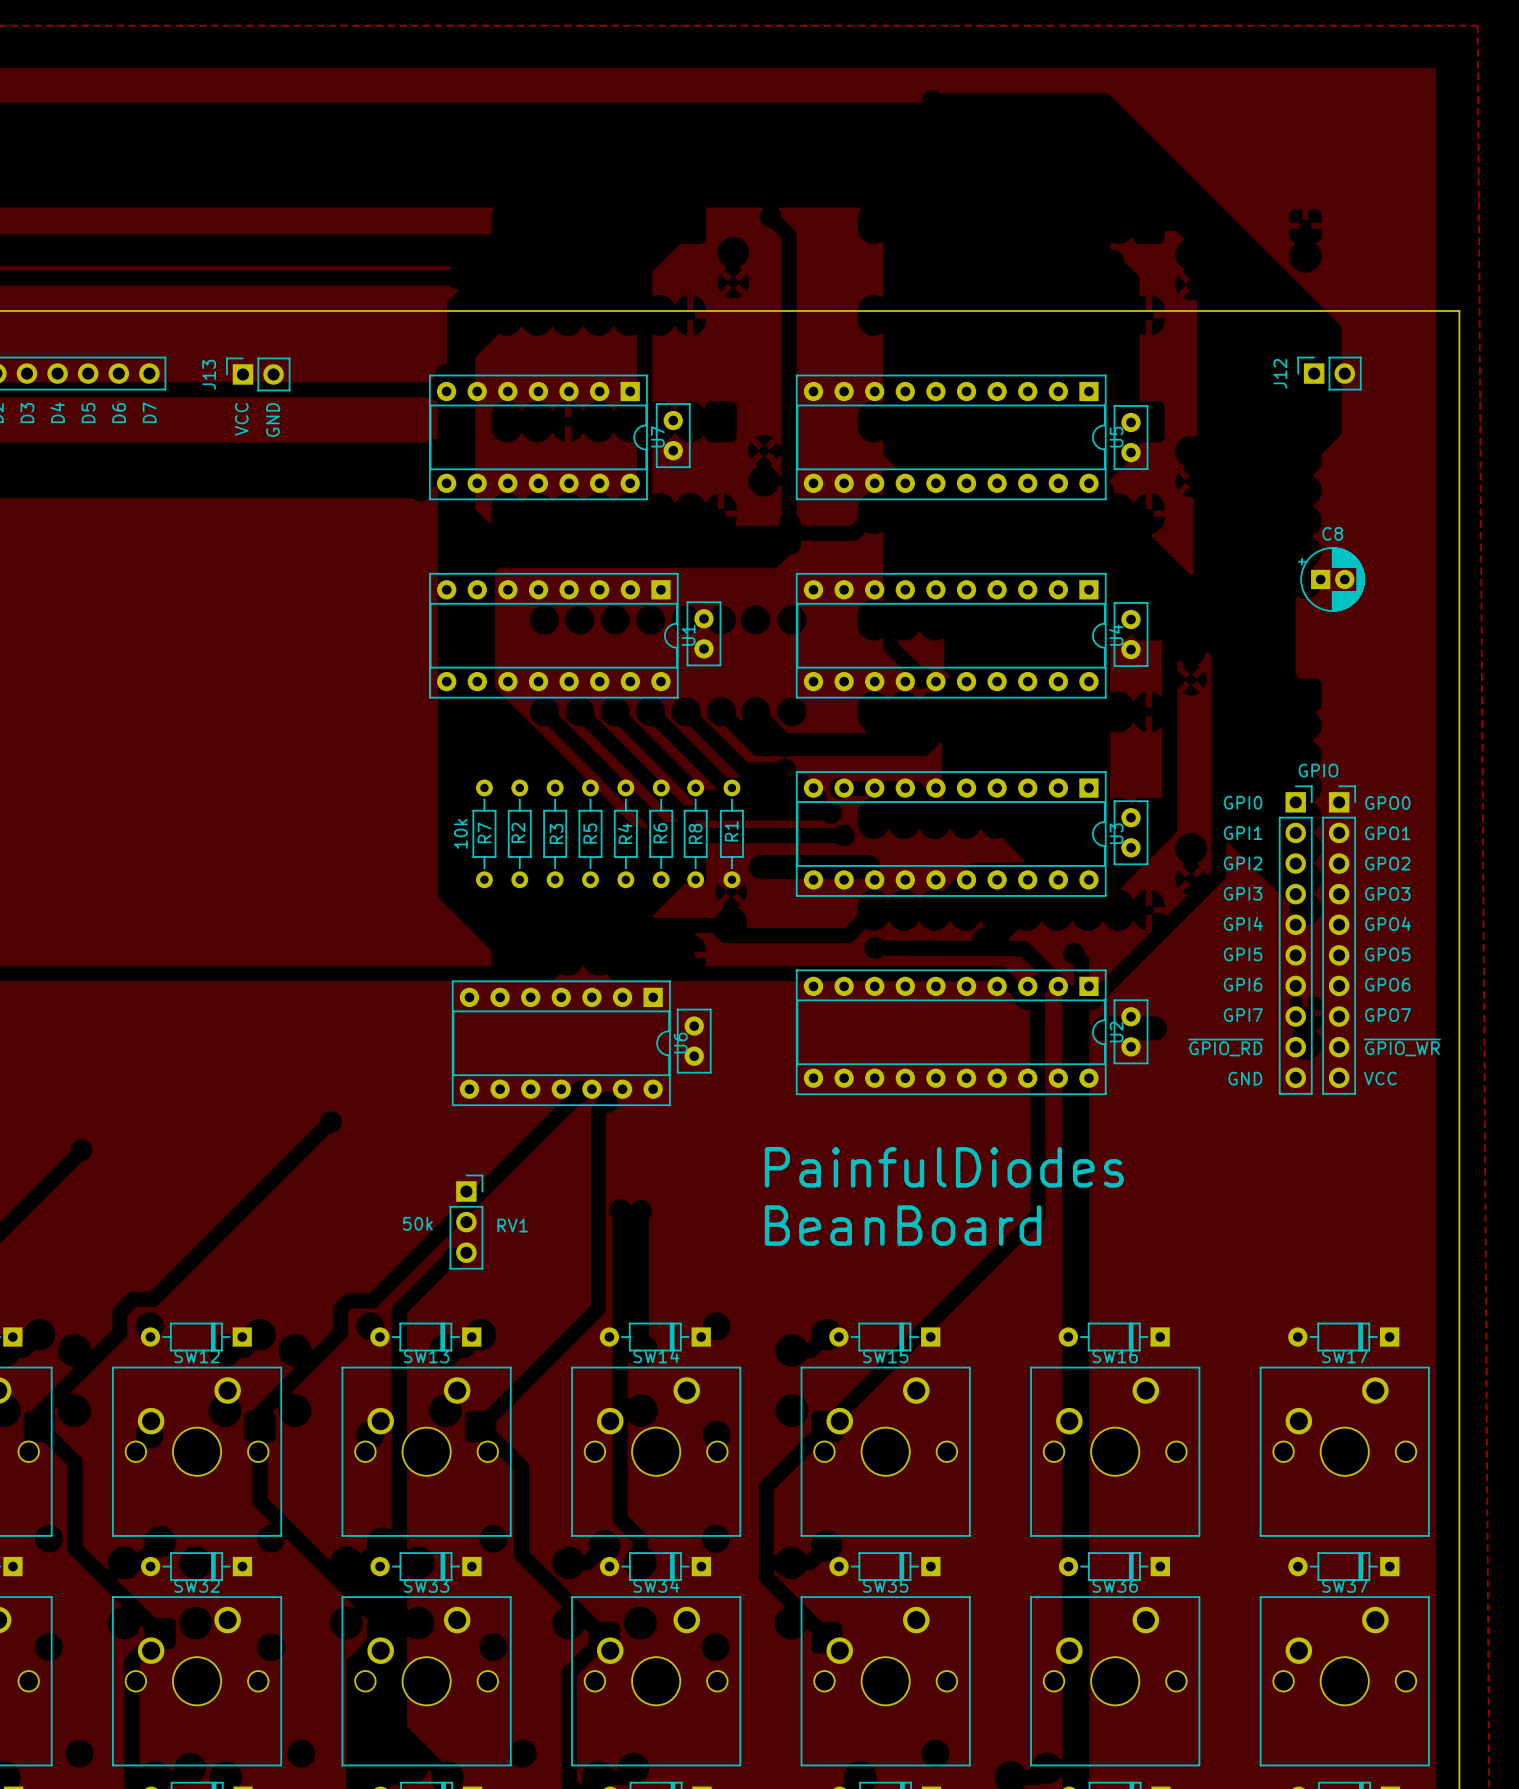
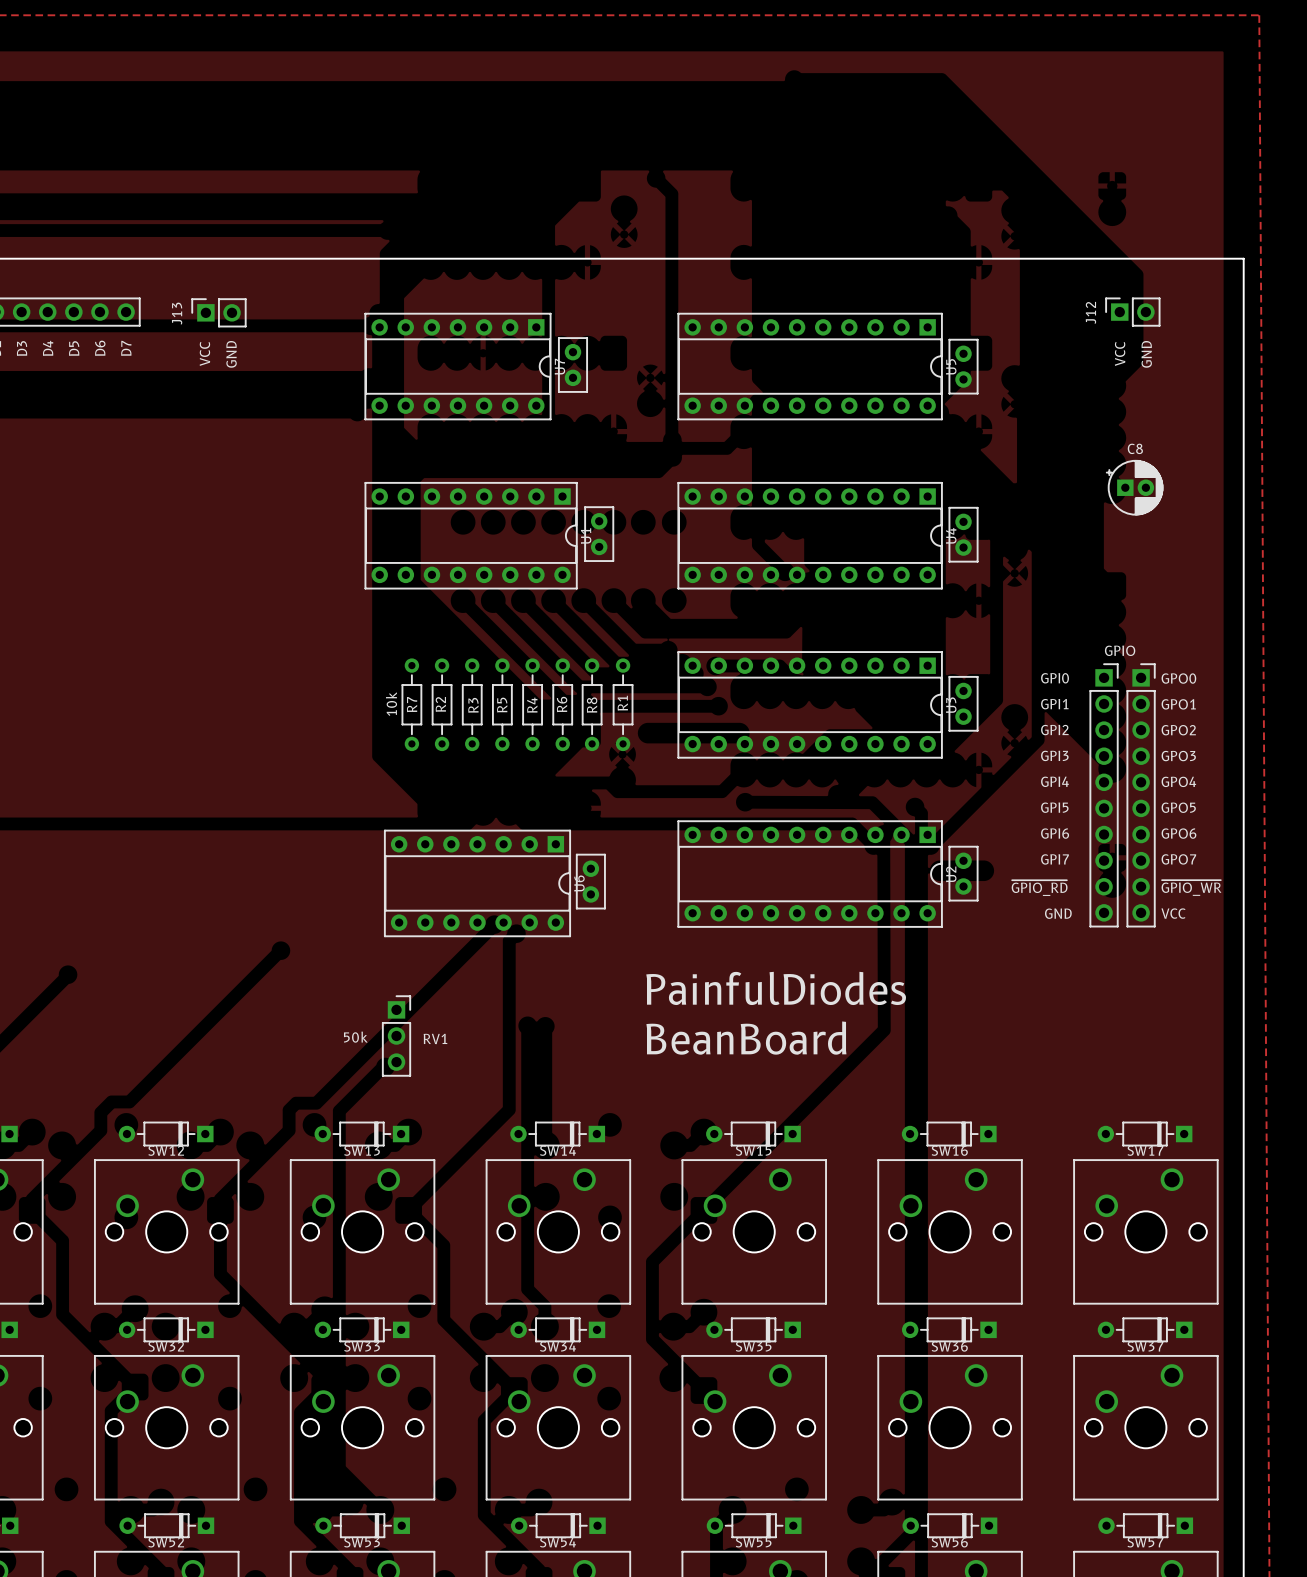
text: none -> VCC (1120, 353)
text: none -> GND (1146, 354)

